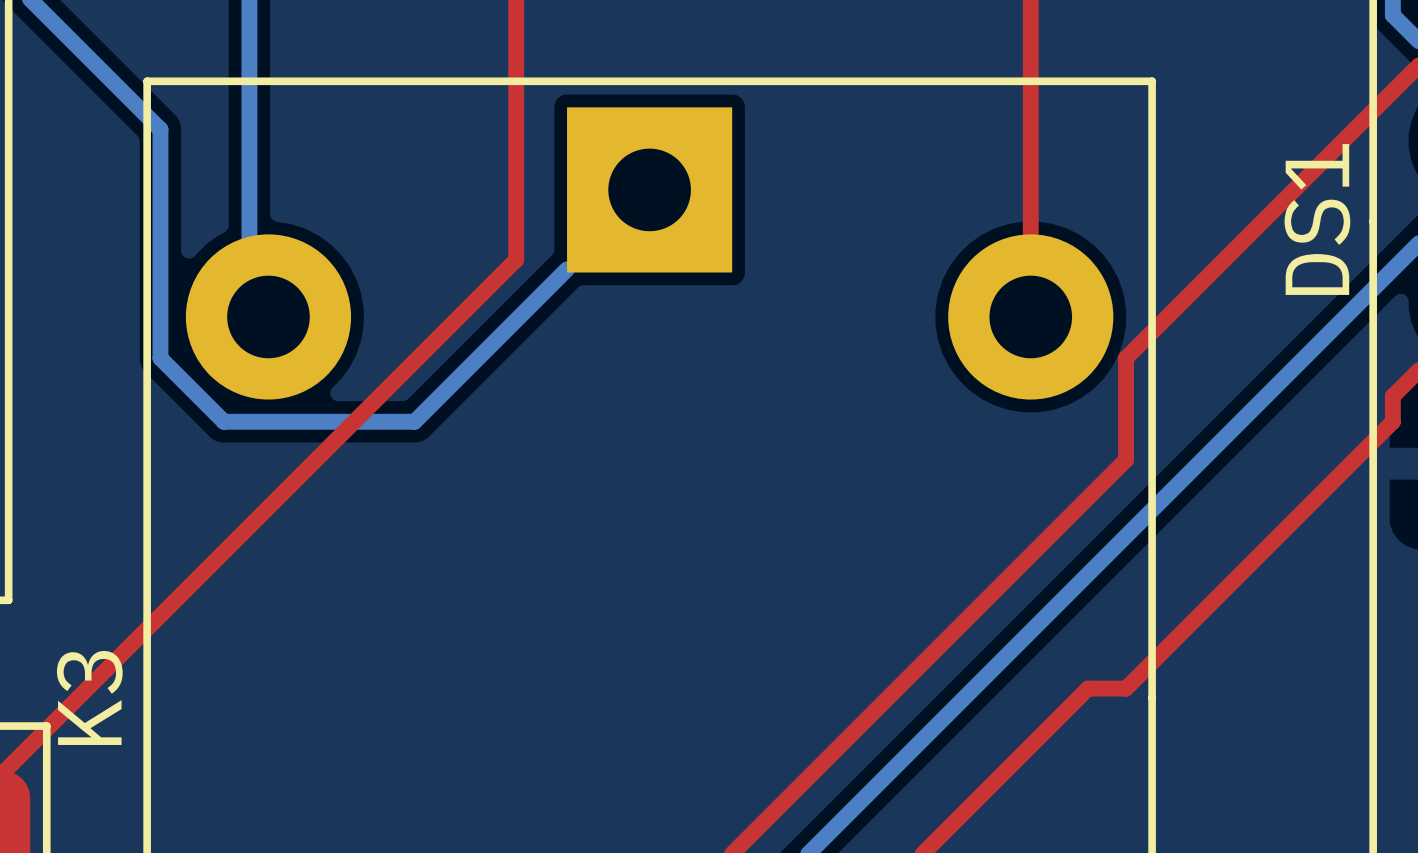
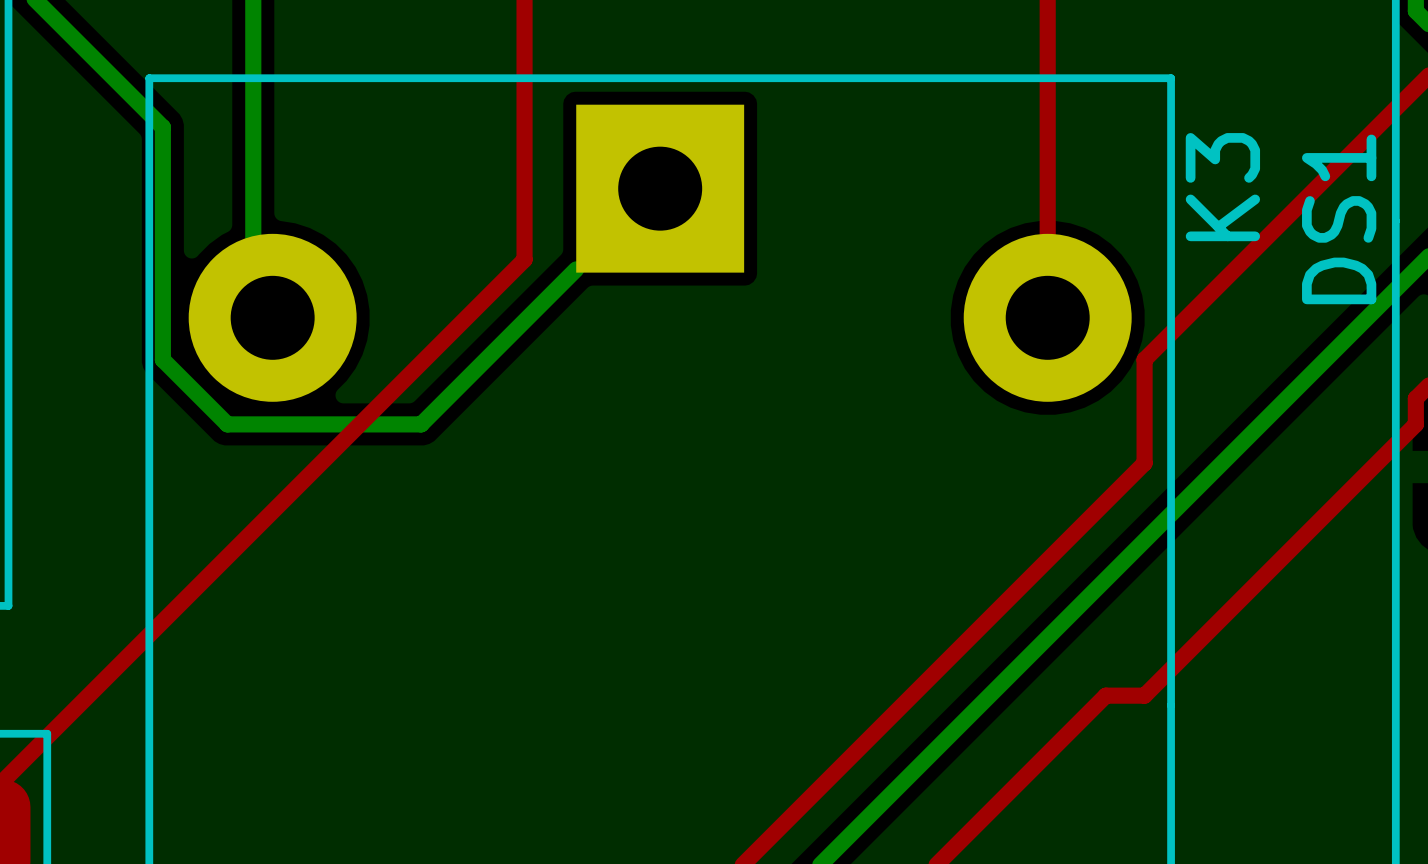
K3 name position: K3 (89, 697) -> K3 (1222, 187)

